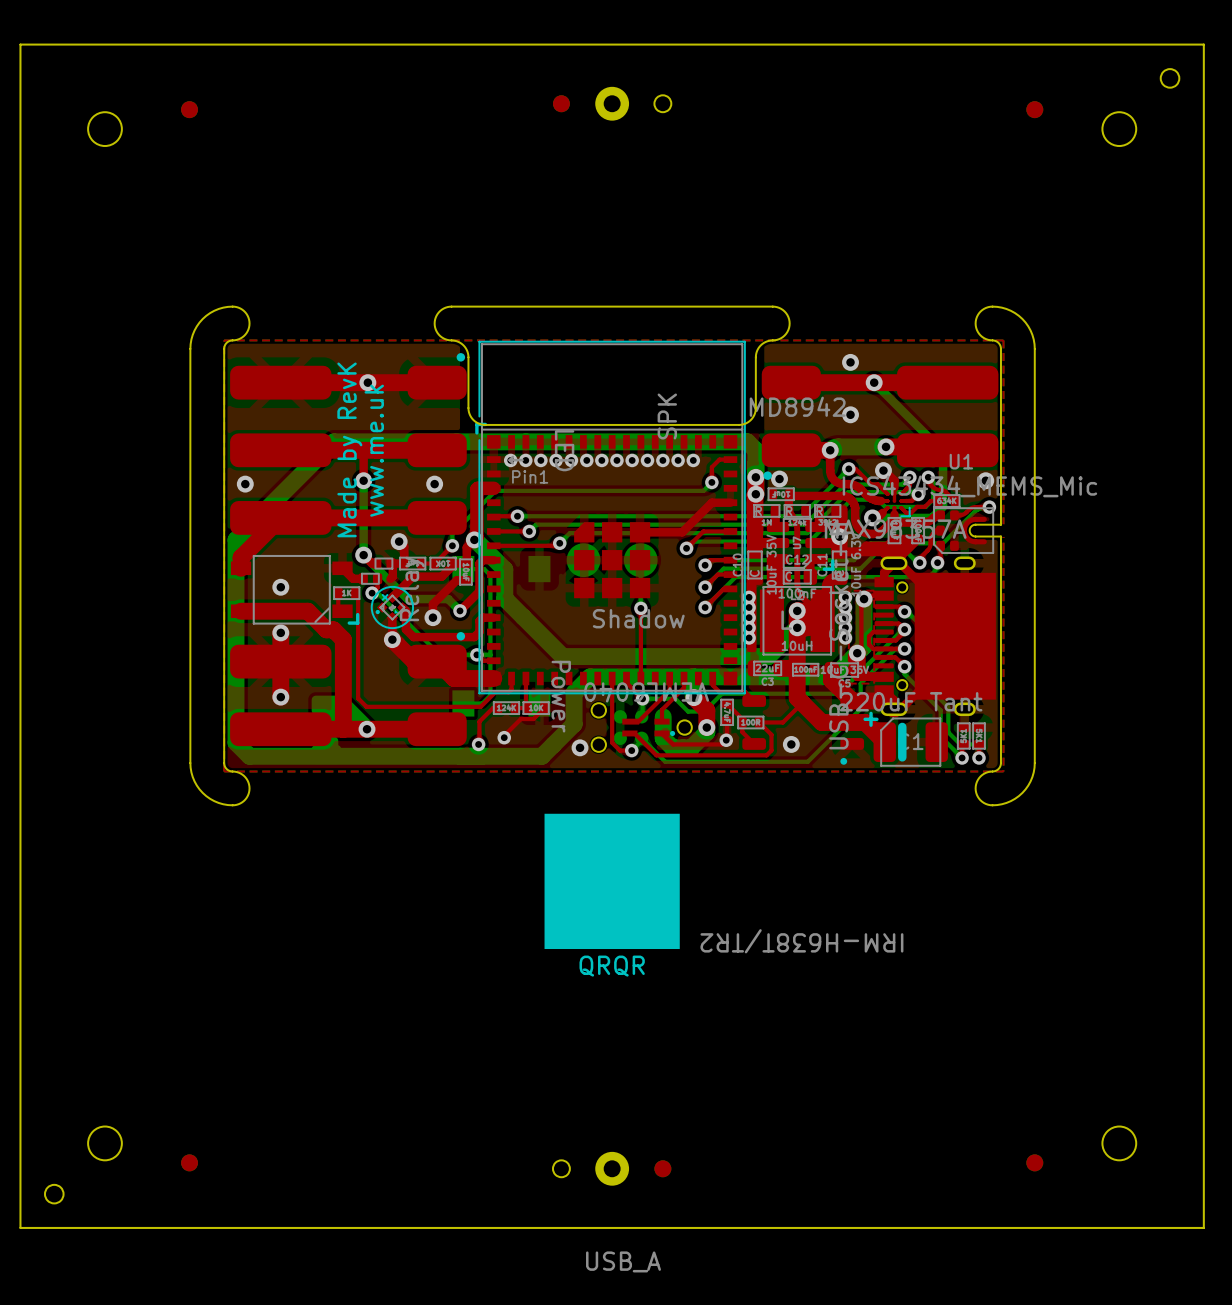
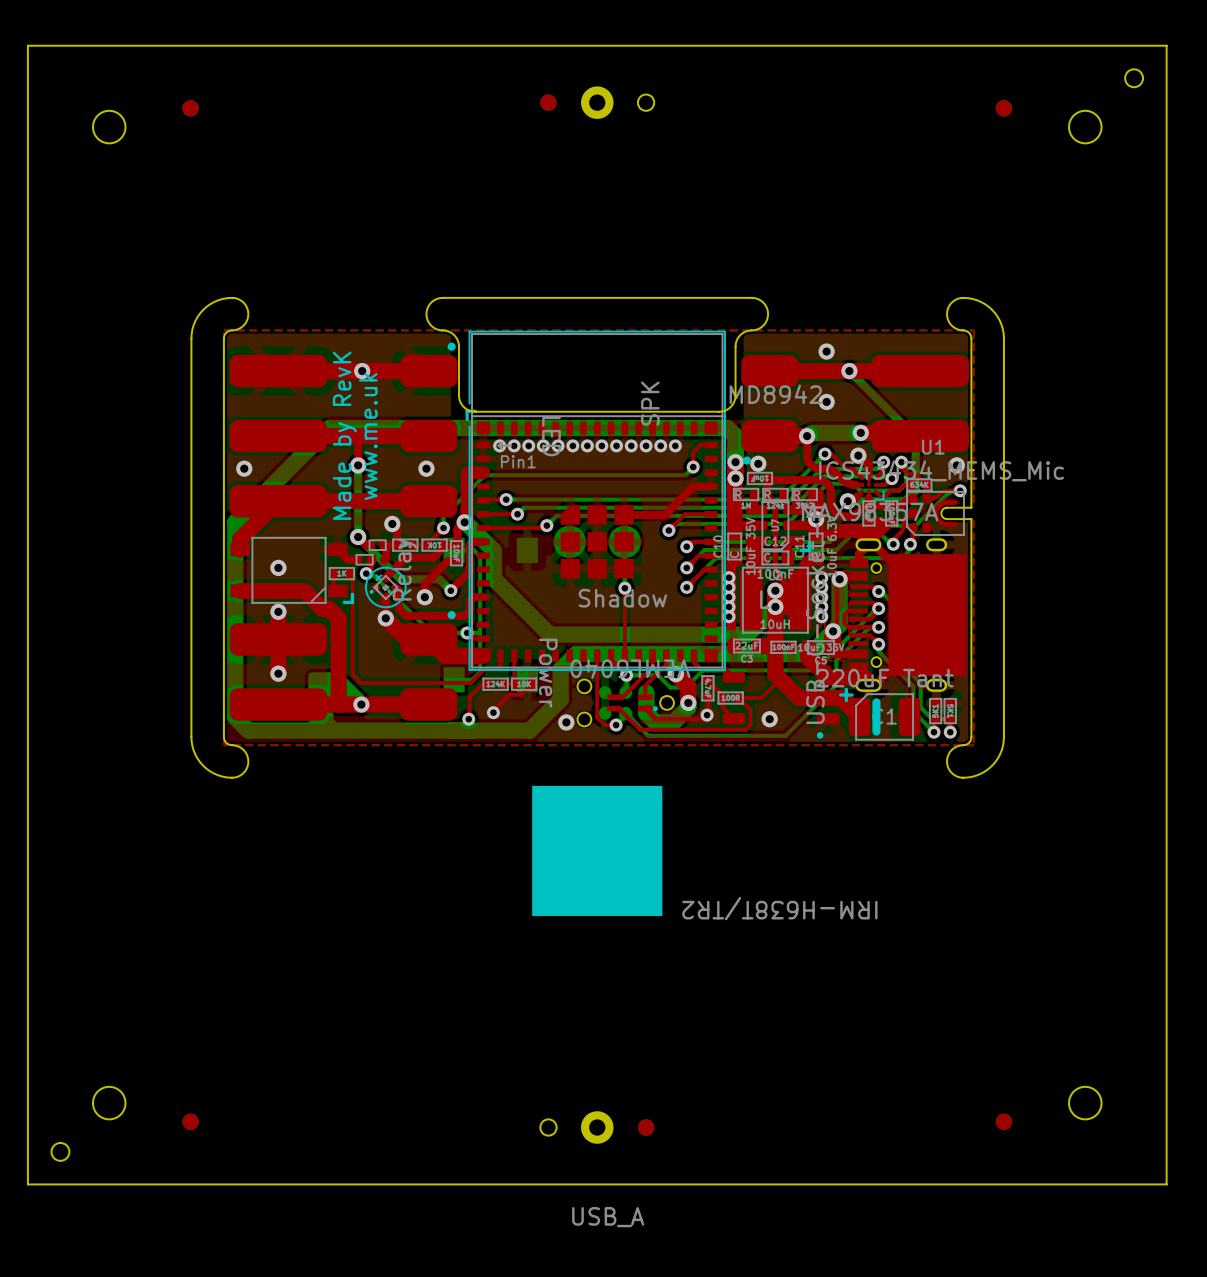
text: QRQR (612, 966) -> none

